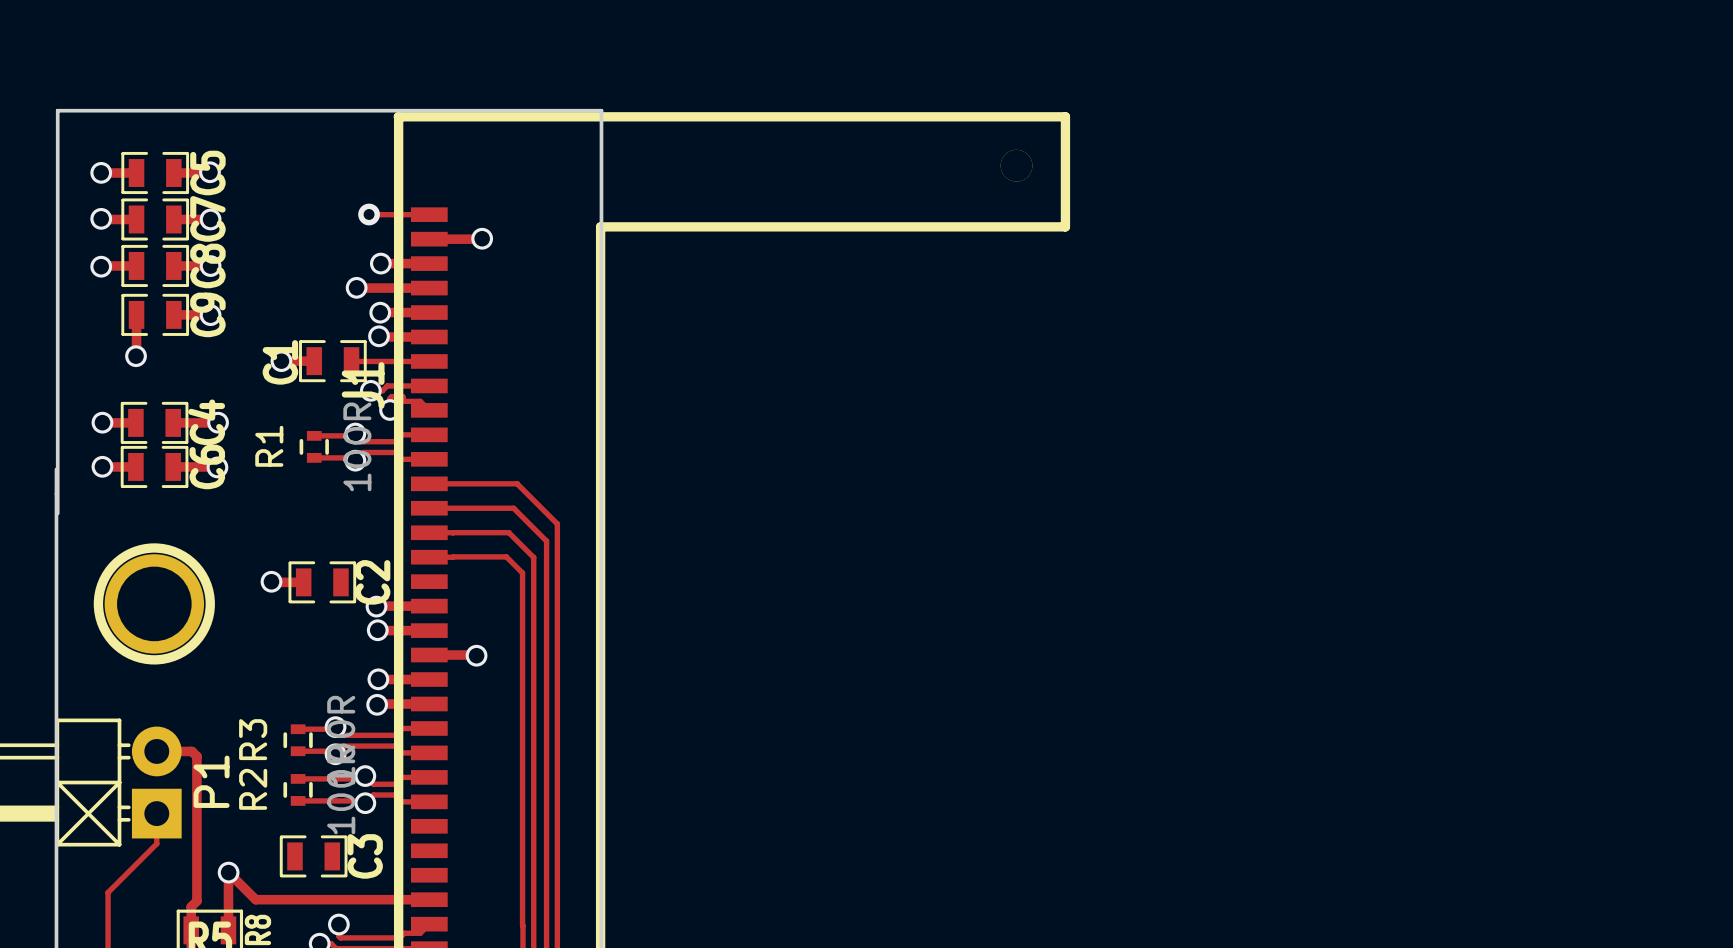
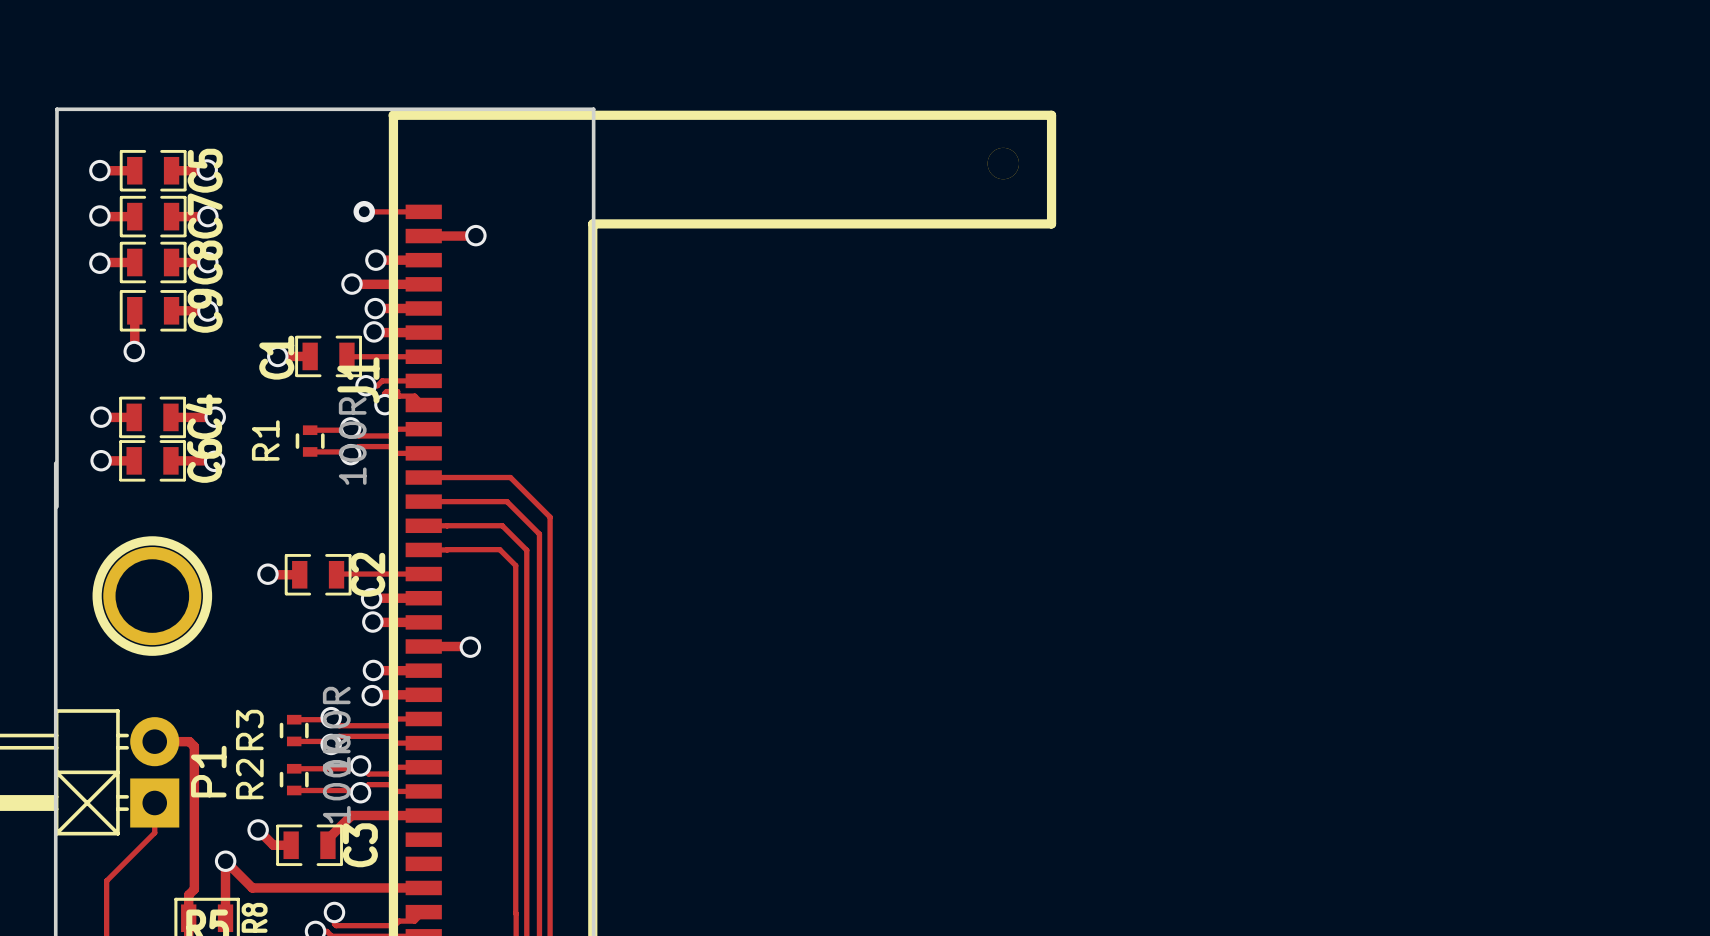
track: none -> (423, 574) (336, 574)
track: none -> (423, 815) (351, 815) (327, 839) (327, 845)
track: none -> (258, 829) (273, 845) (291, 845)
via: none -> (258, 829)

